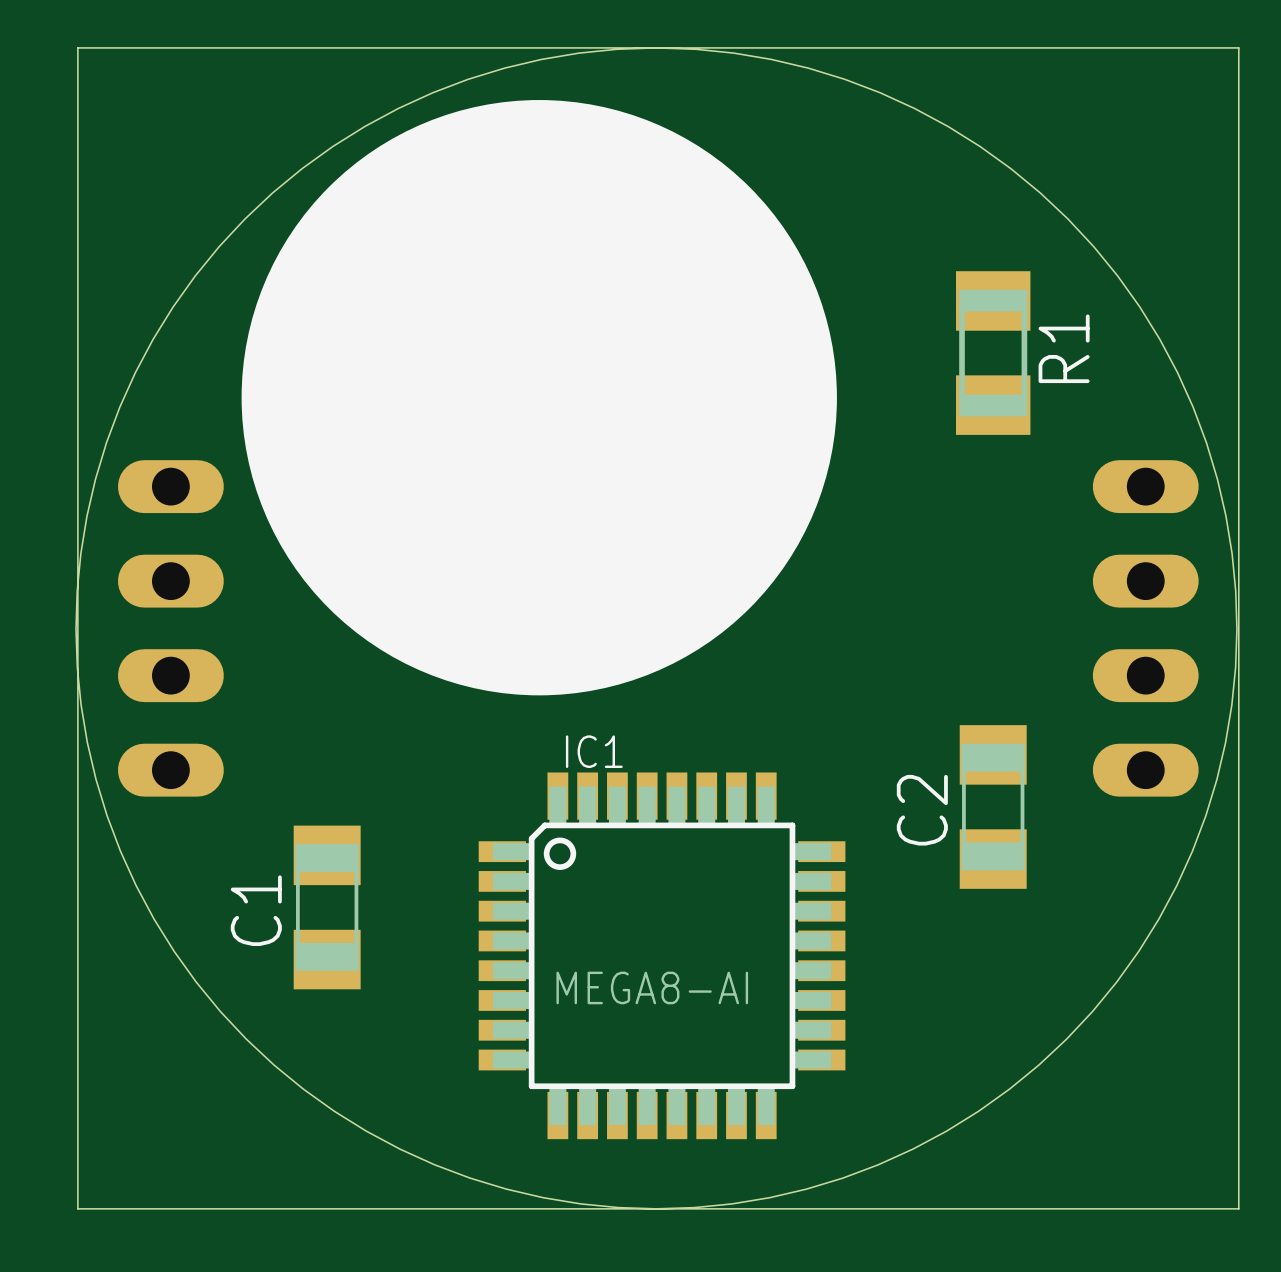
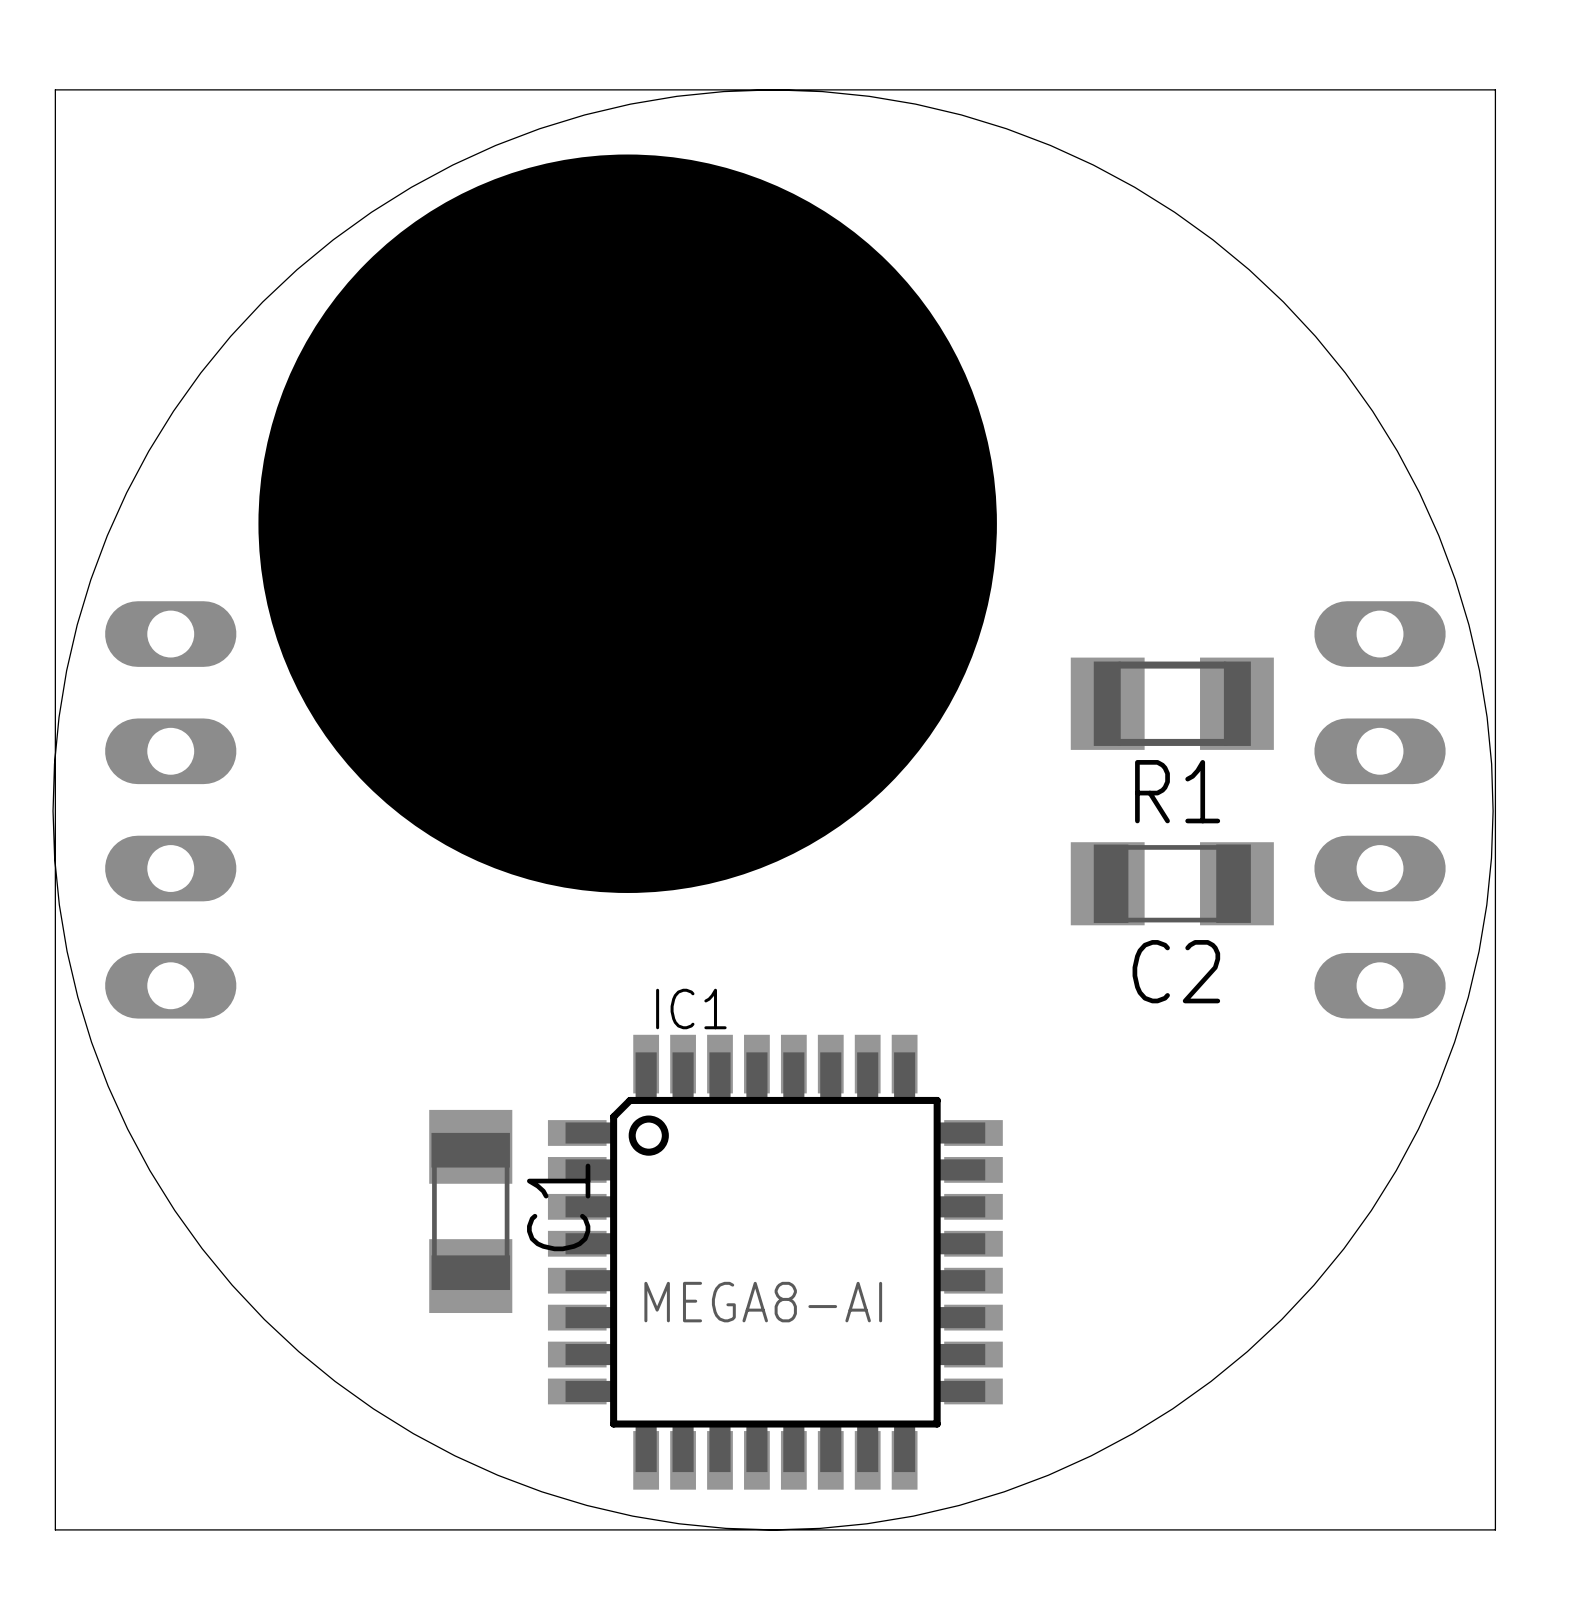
R1 rotation: 0° (993, 353) -> 90° clockwise (1172, 703)
R1 position: (993, 353) -> (1172, 703)
C2 rotation: 0° (993, 806) -> 90° clockwise (1172, 883)
C2 position: (993, 806) -> (1172, 883)
C2 name position: C2 (922, 810) -> C2 (1176, 971)
C1 position: (327, 907) -> (470, 1211)
C1 name position: C1 (256, 910) -> C1 (558, 1207)
IC1 position: (662, 955) -> (775, 1262)

